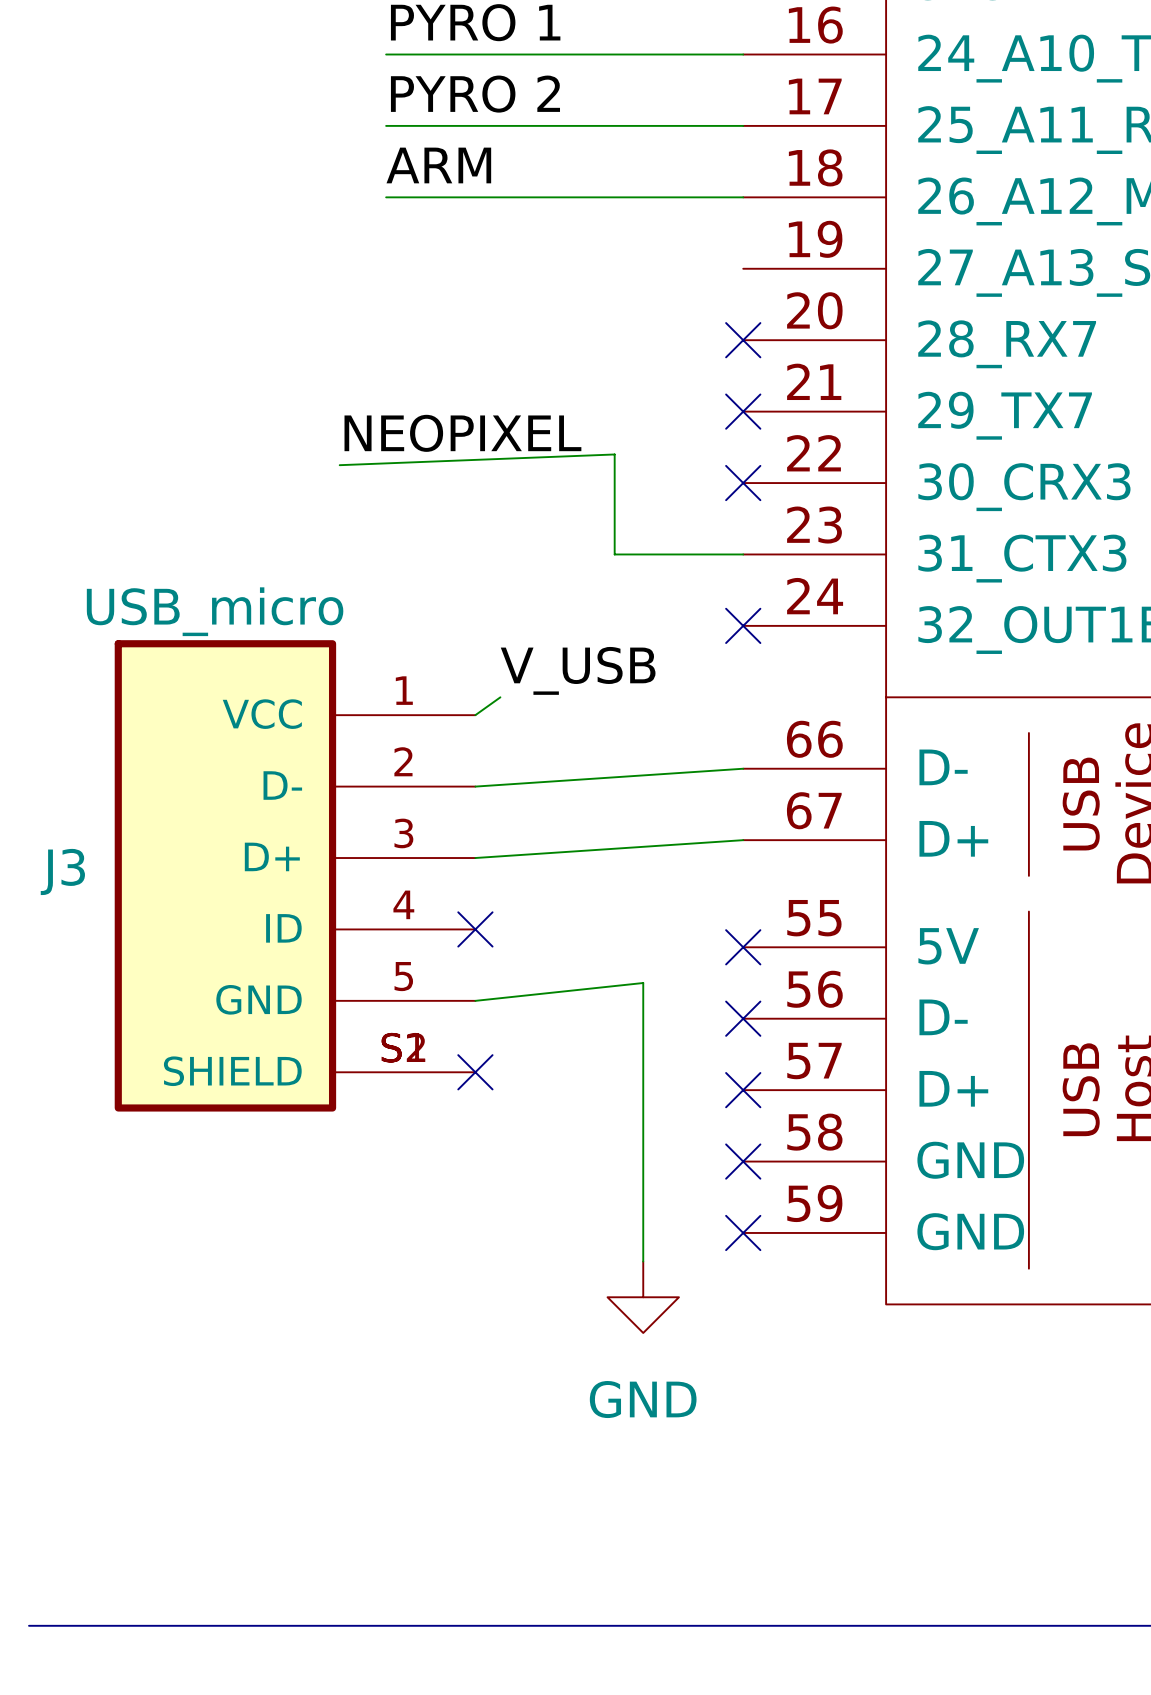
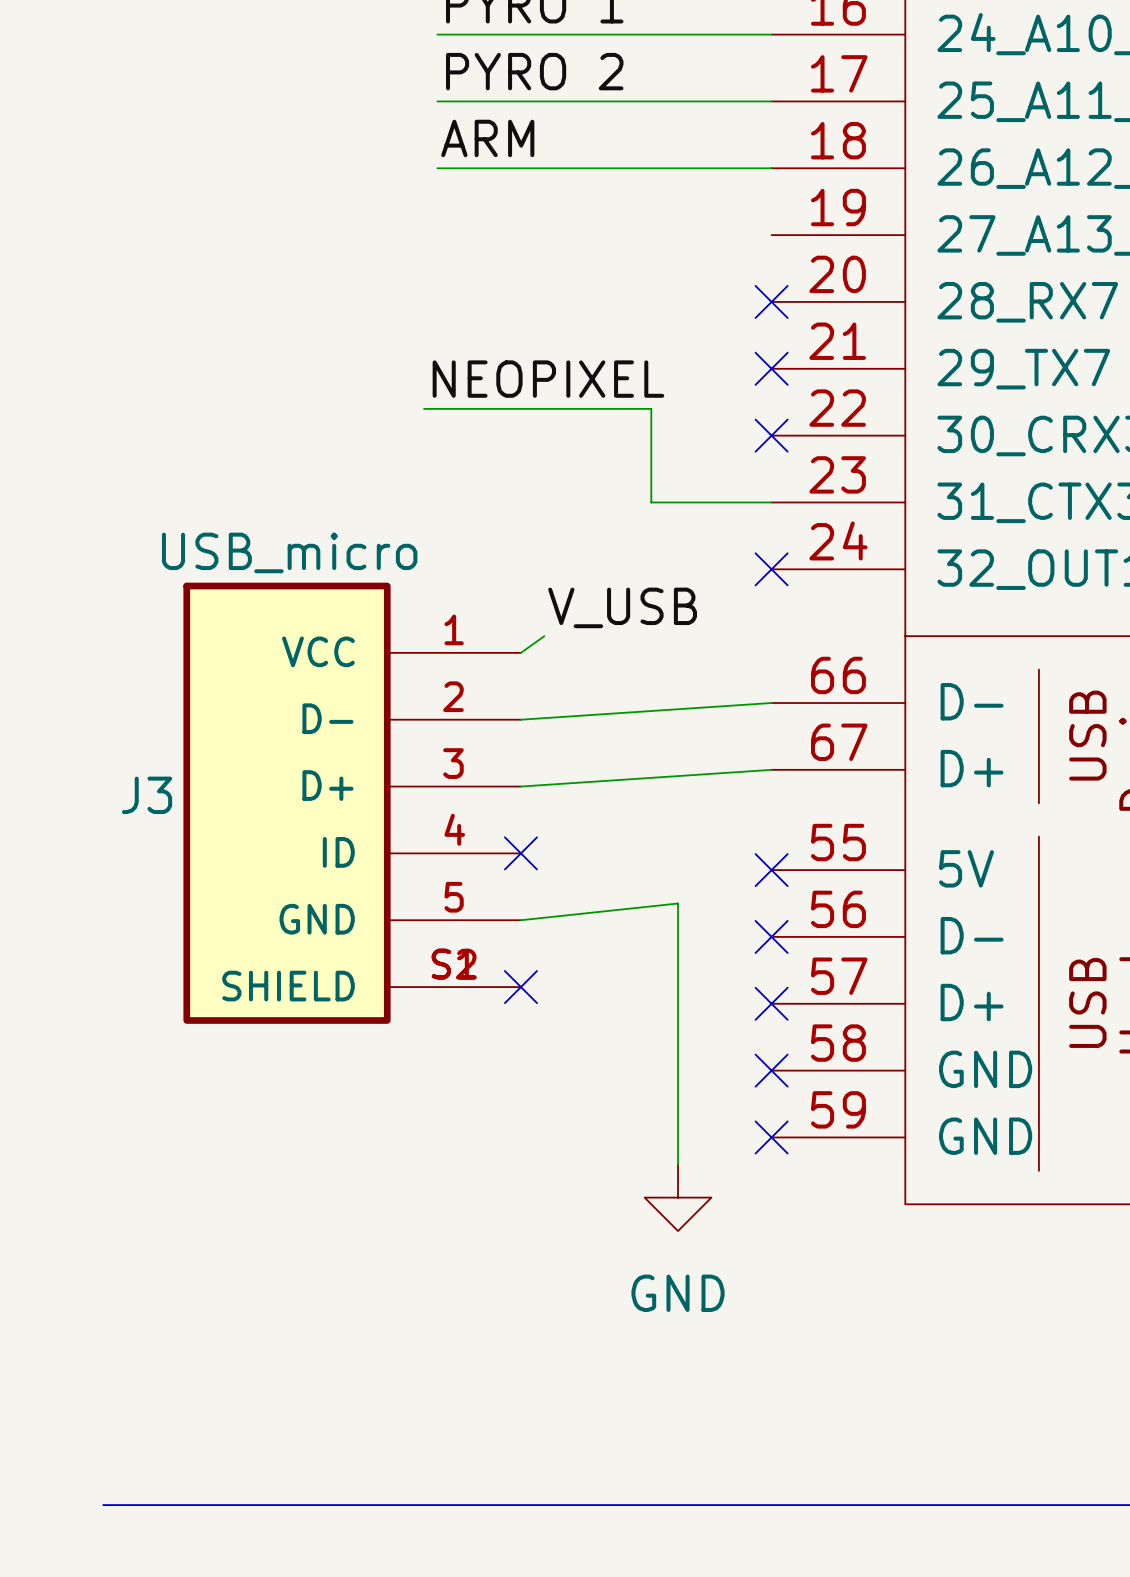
label position: NEOPIXEL (462, 433) -> NEOPIXEL (548, 379)
wire: (614, 454) (339, 465) -> (651, 408) (424, 408)

